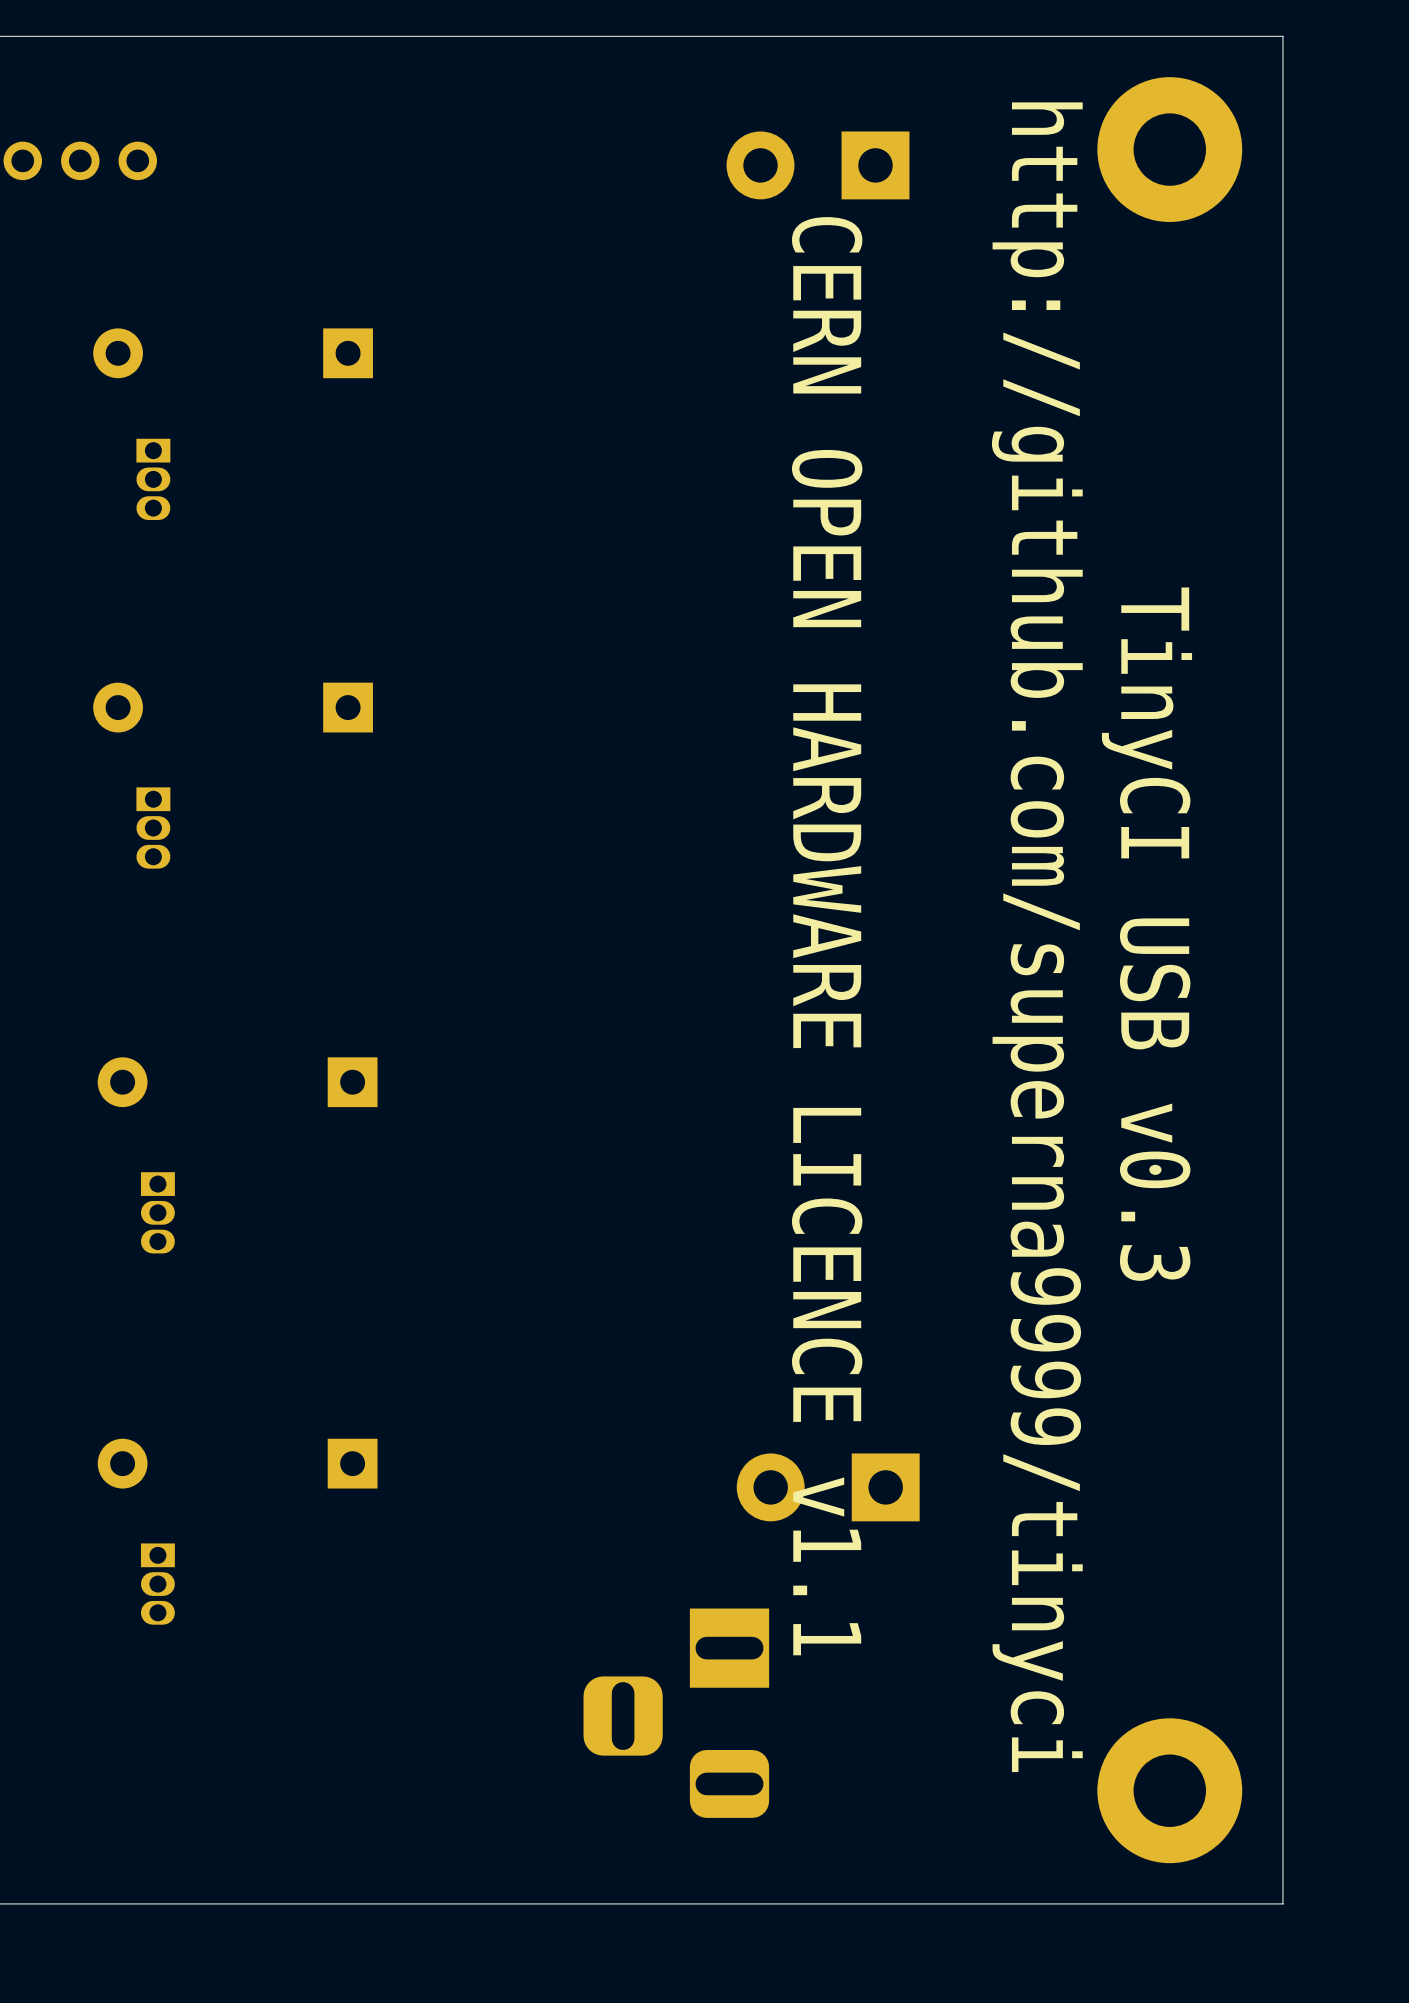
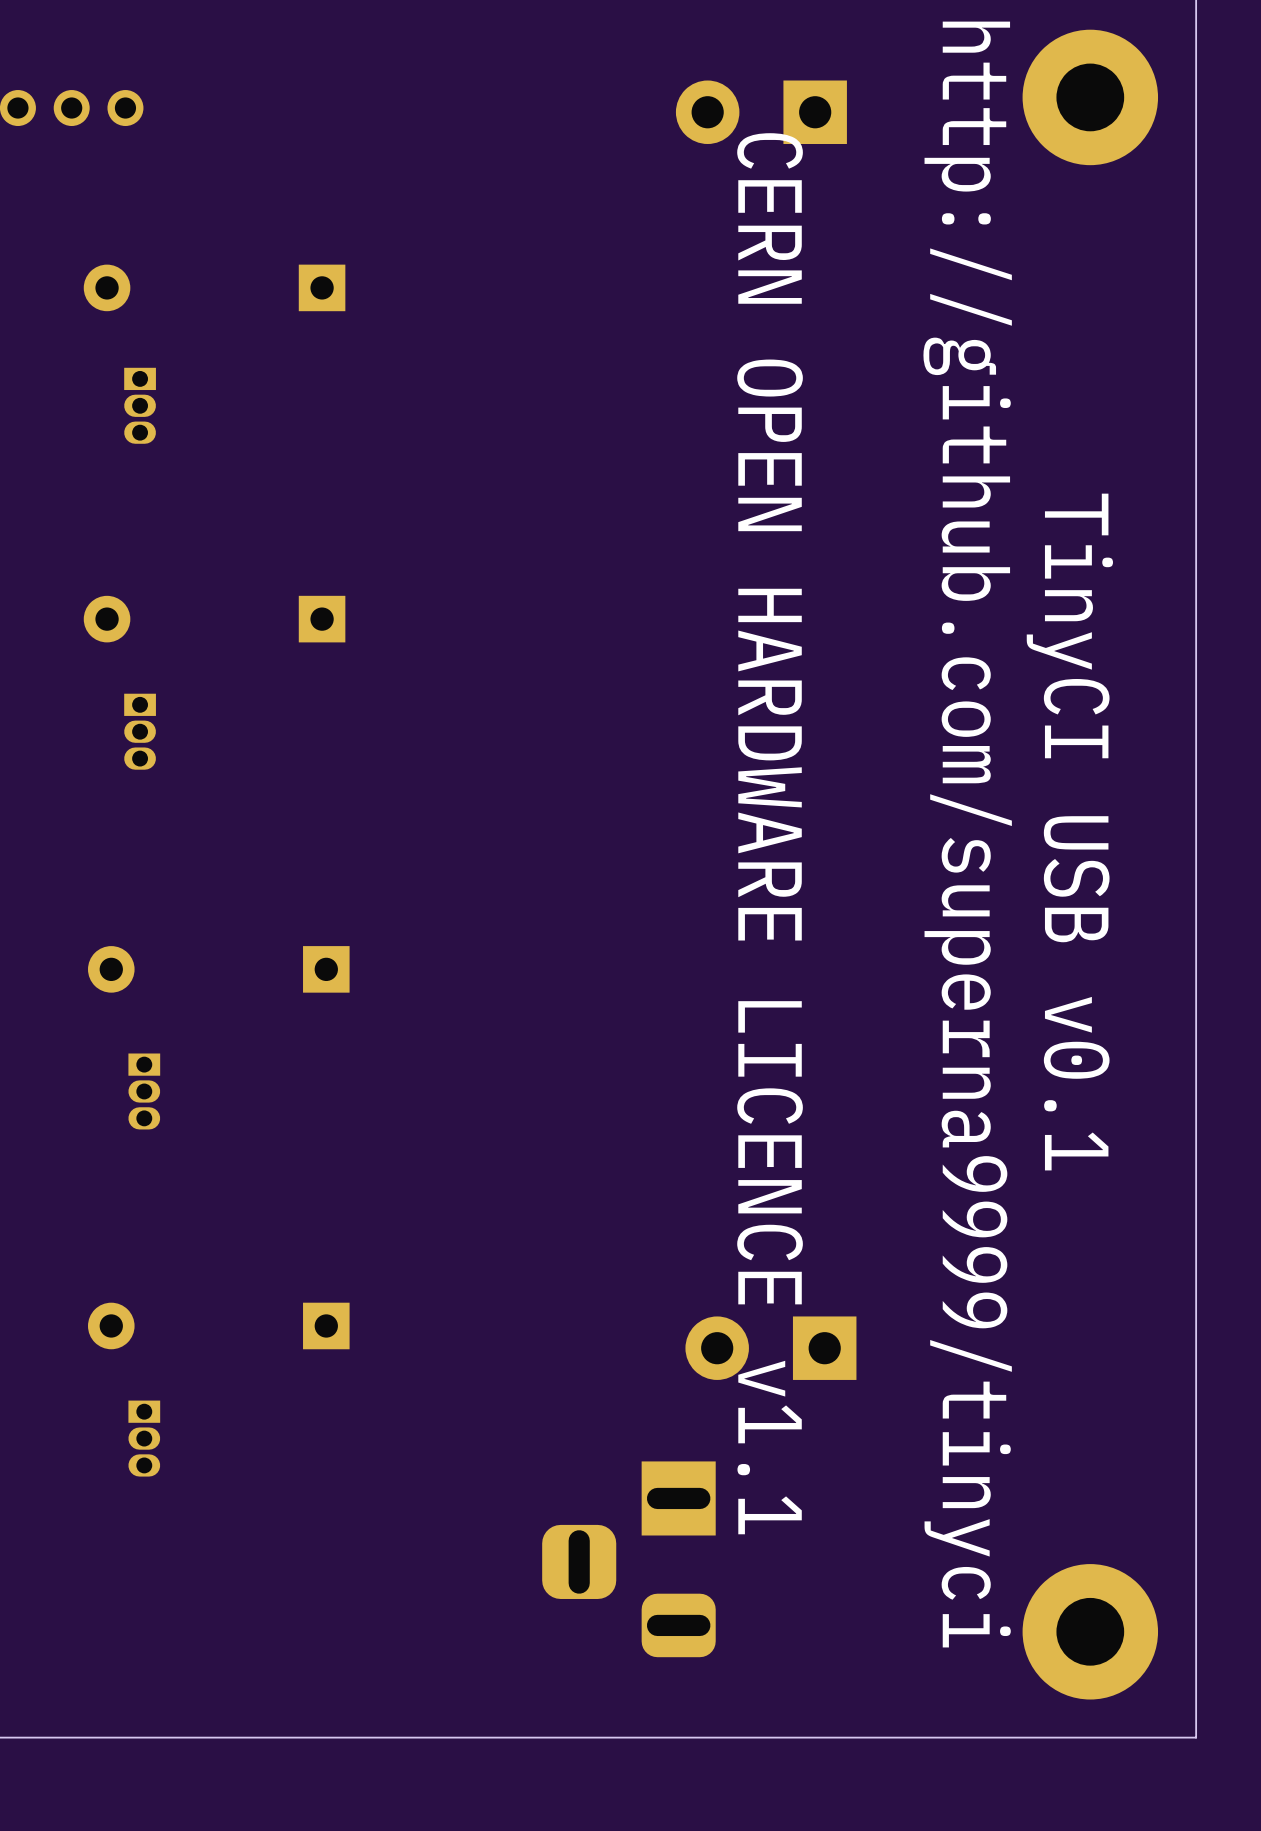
text: TinyCI USB v0.3 (1146, 934) -> TinyCI USB v0.1 (1069, 832)

